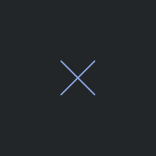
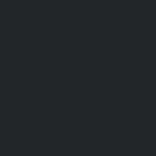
no-connect mark: (77, 77) -> none

